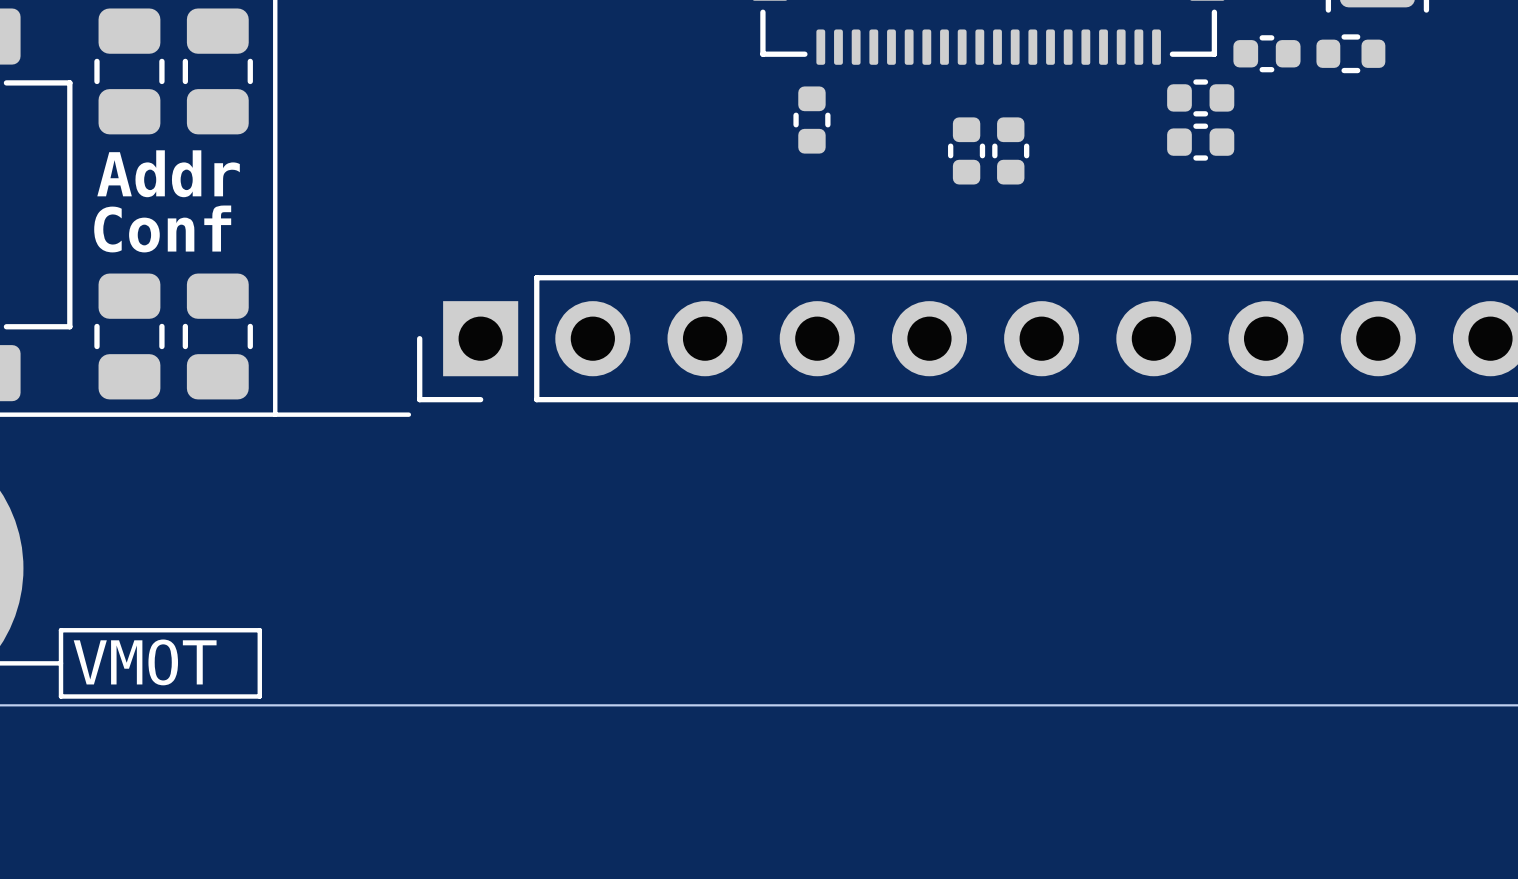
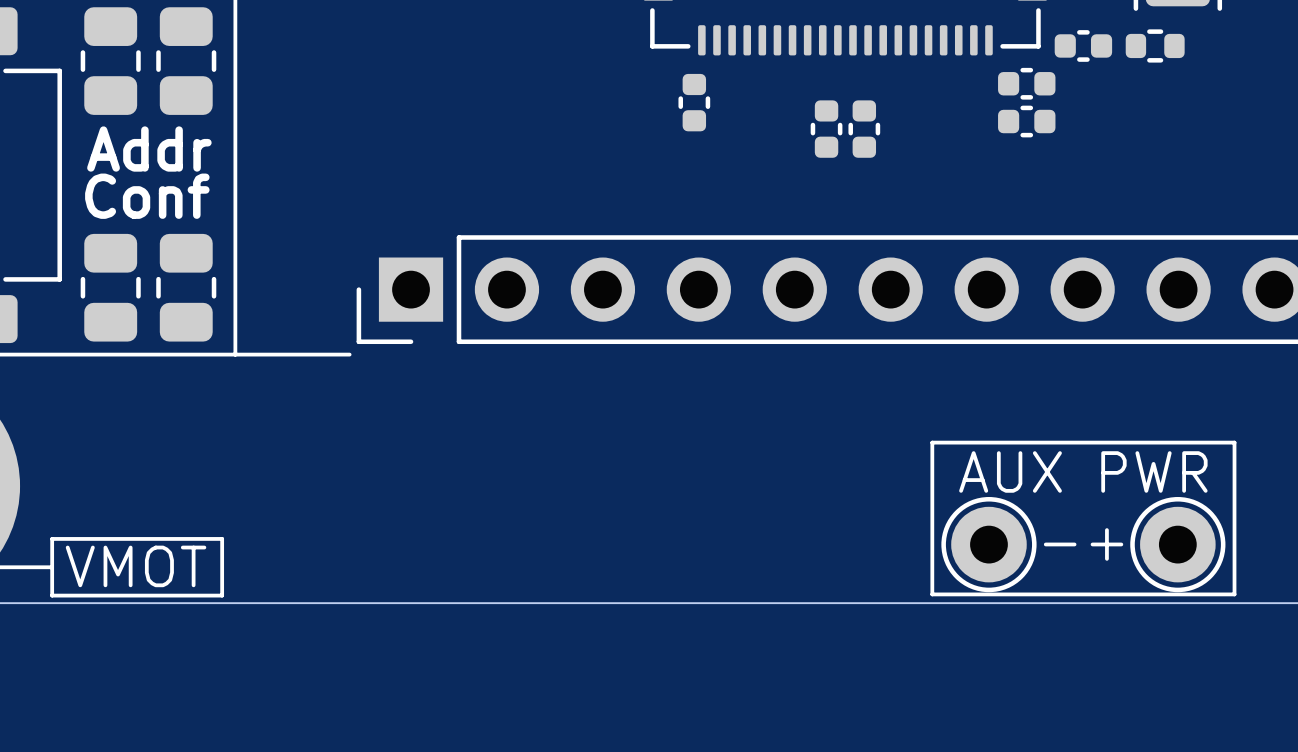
line: none -> (932, 442) (1234, 442) (1234, 594) (932, 594) (932, 442)
text: none -> AUX PWR (1083, 471)
text: none -> -+ (1083, 544)
part: none -> (988, 544)
part: none -> (1177, 544)

